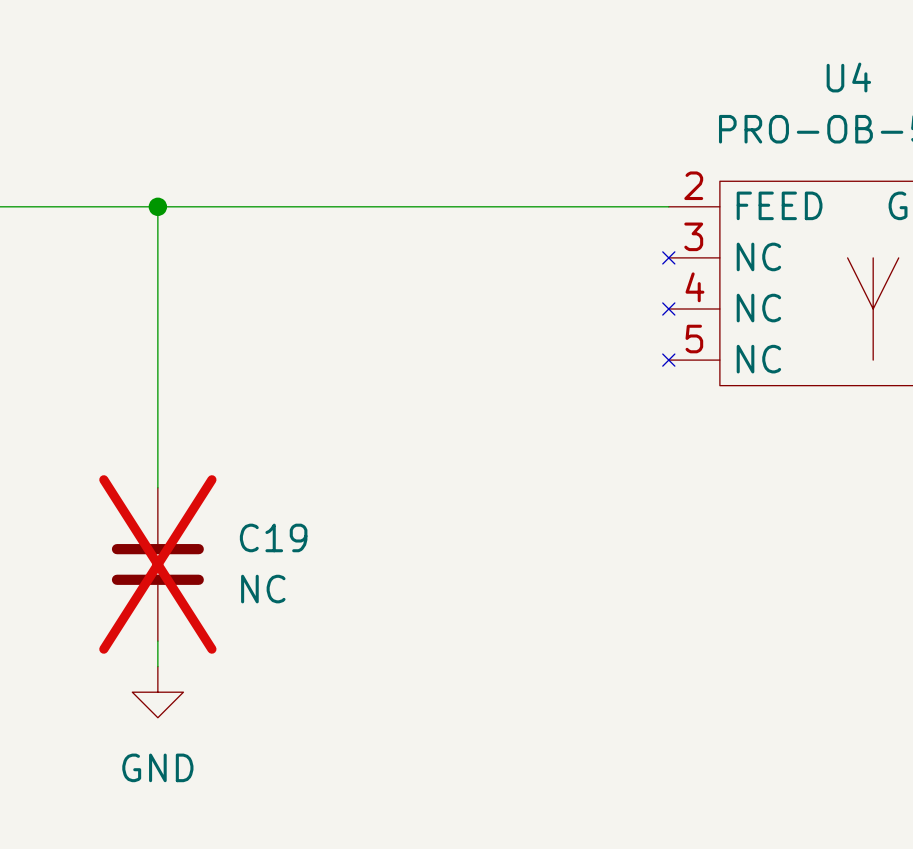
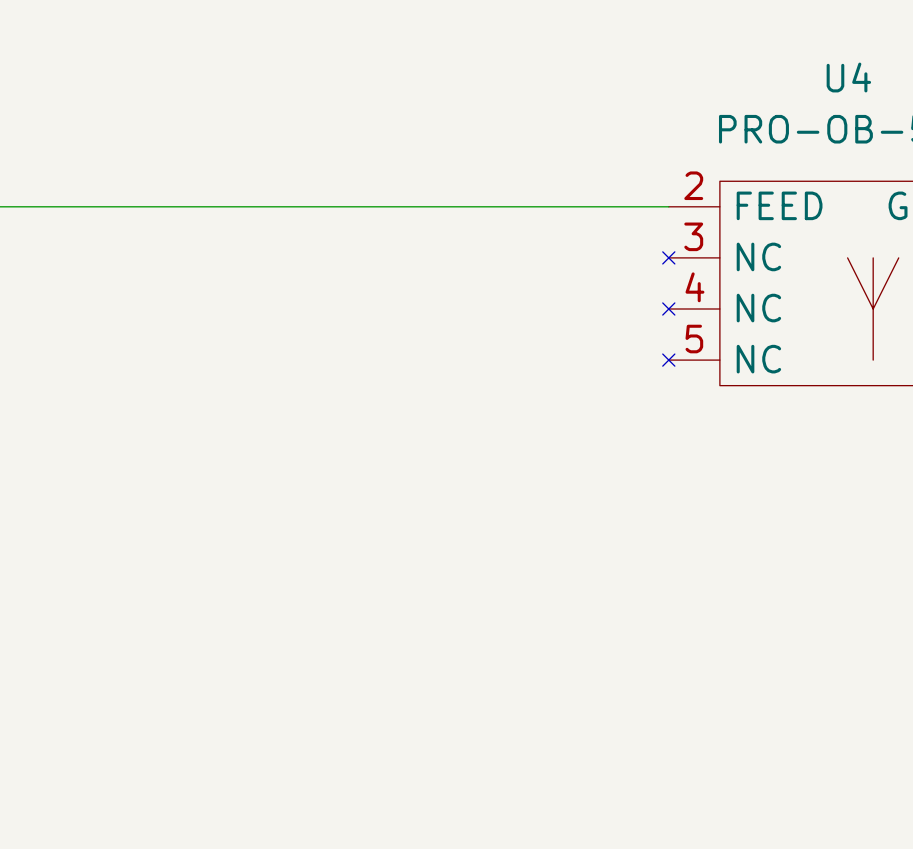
wire: (157, 206) (157, 487) -> none
junction: (157, 206) -> none
C19: NC (157, 564) -> none
wire: (157, 641) (157, 666) -> none
power symbol: GND (157, 692) -> none

